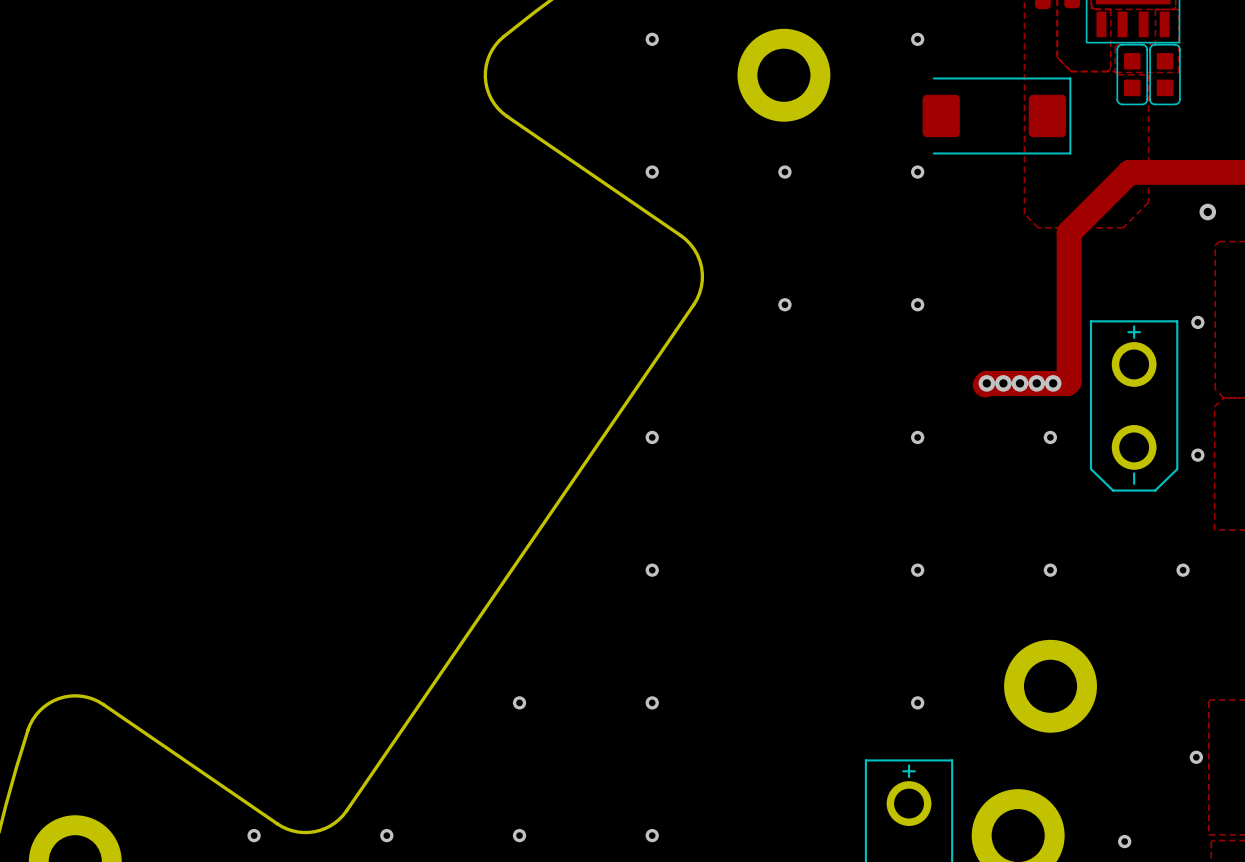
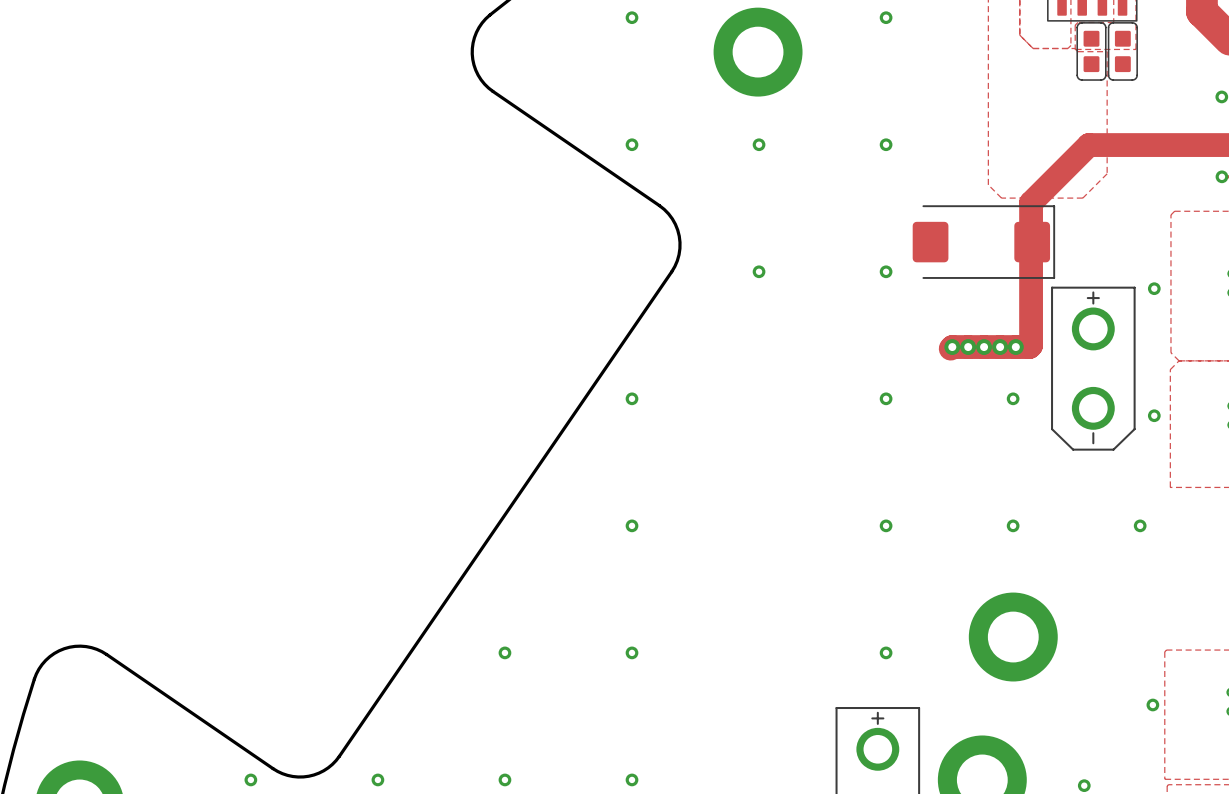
part position: (996, 115) -> (983, 242)
via: (1207, 212) -> none

